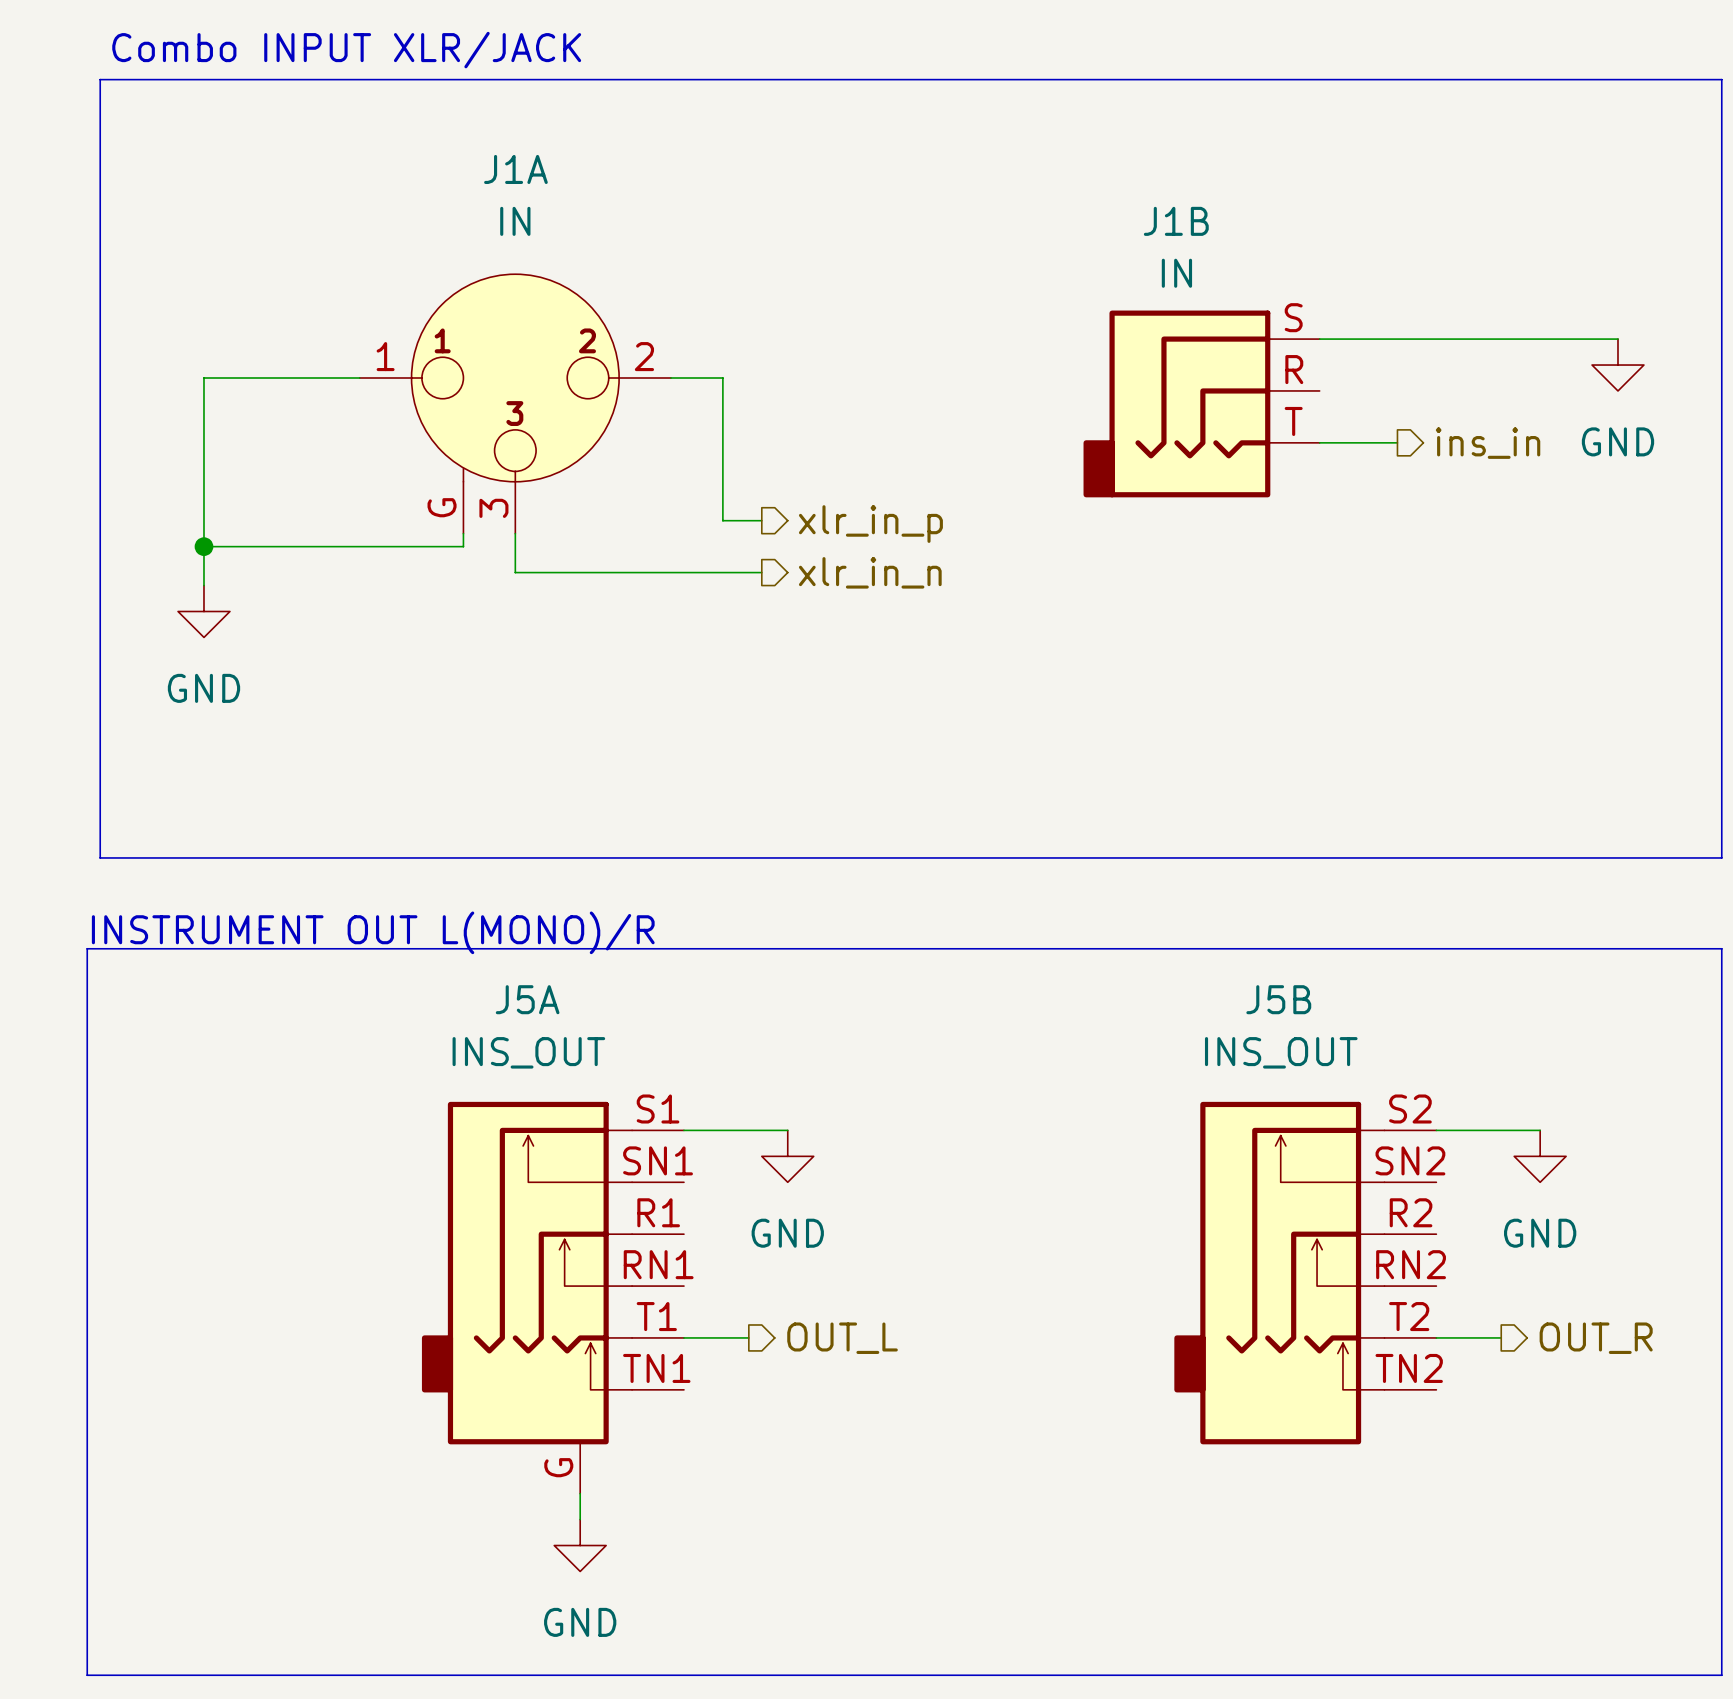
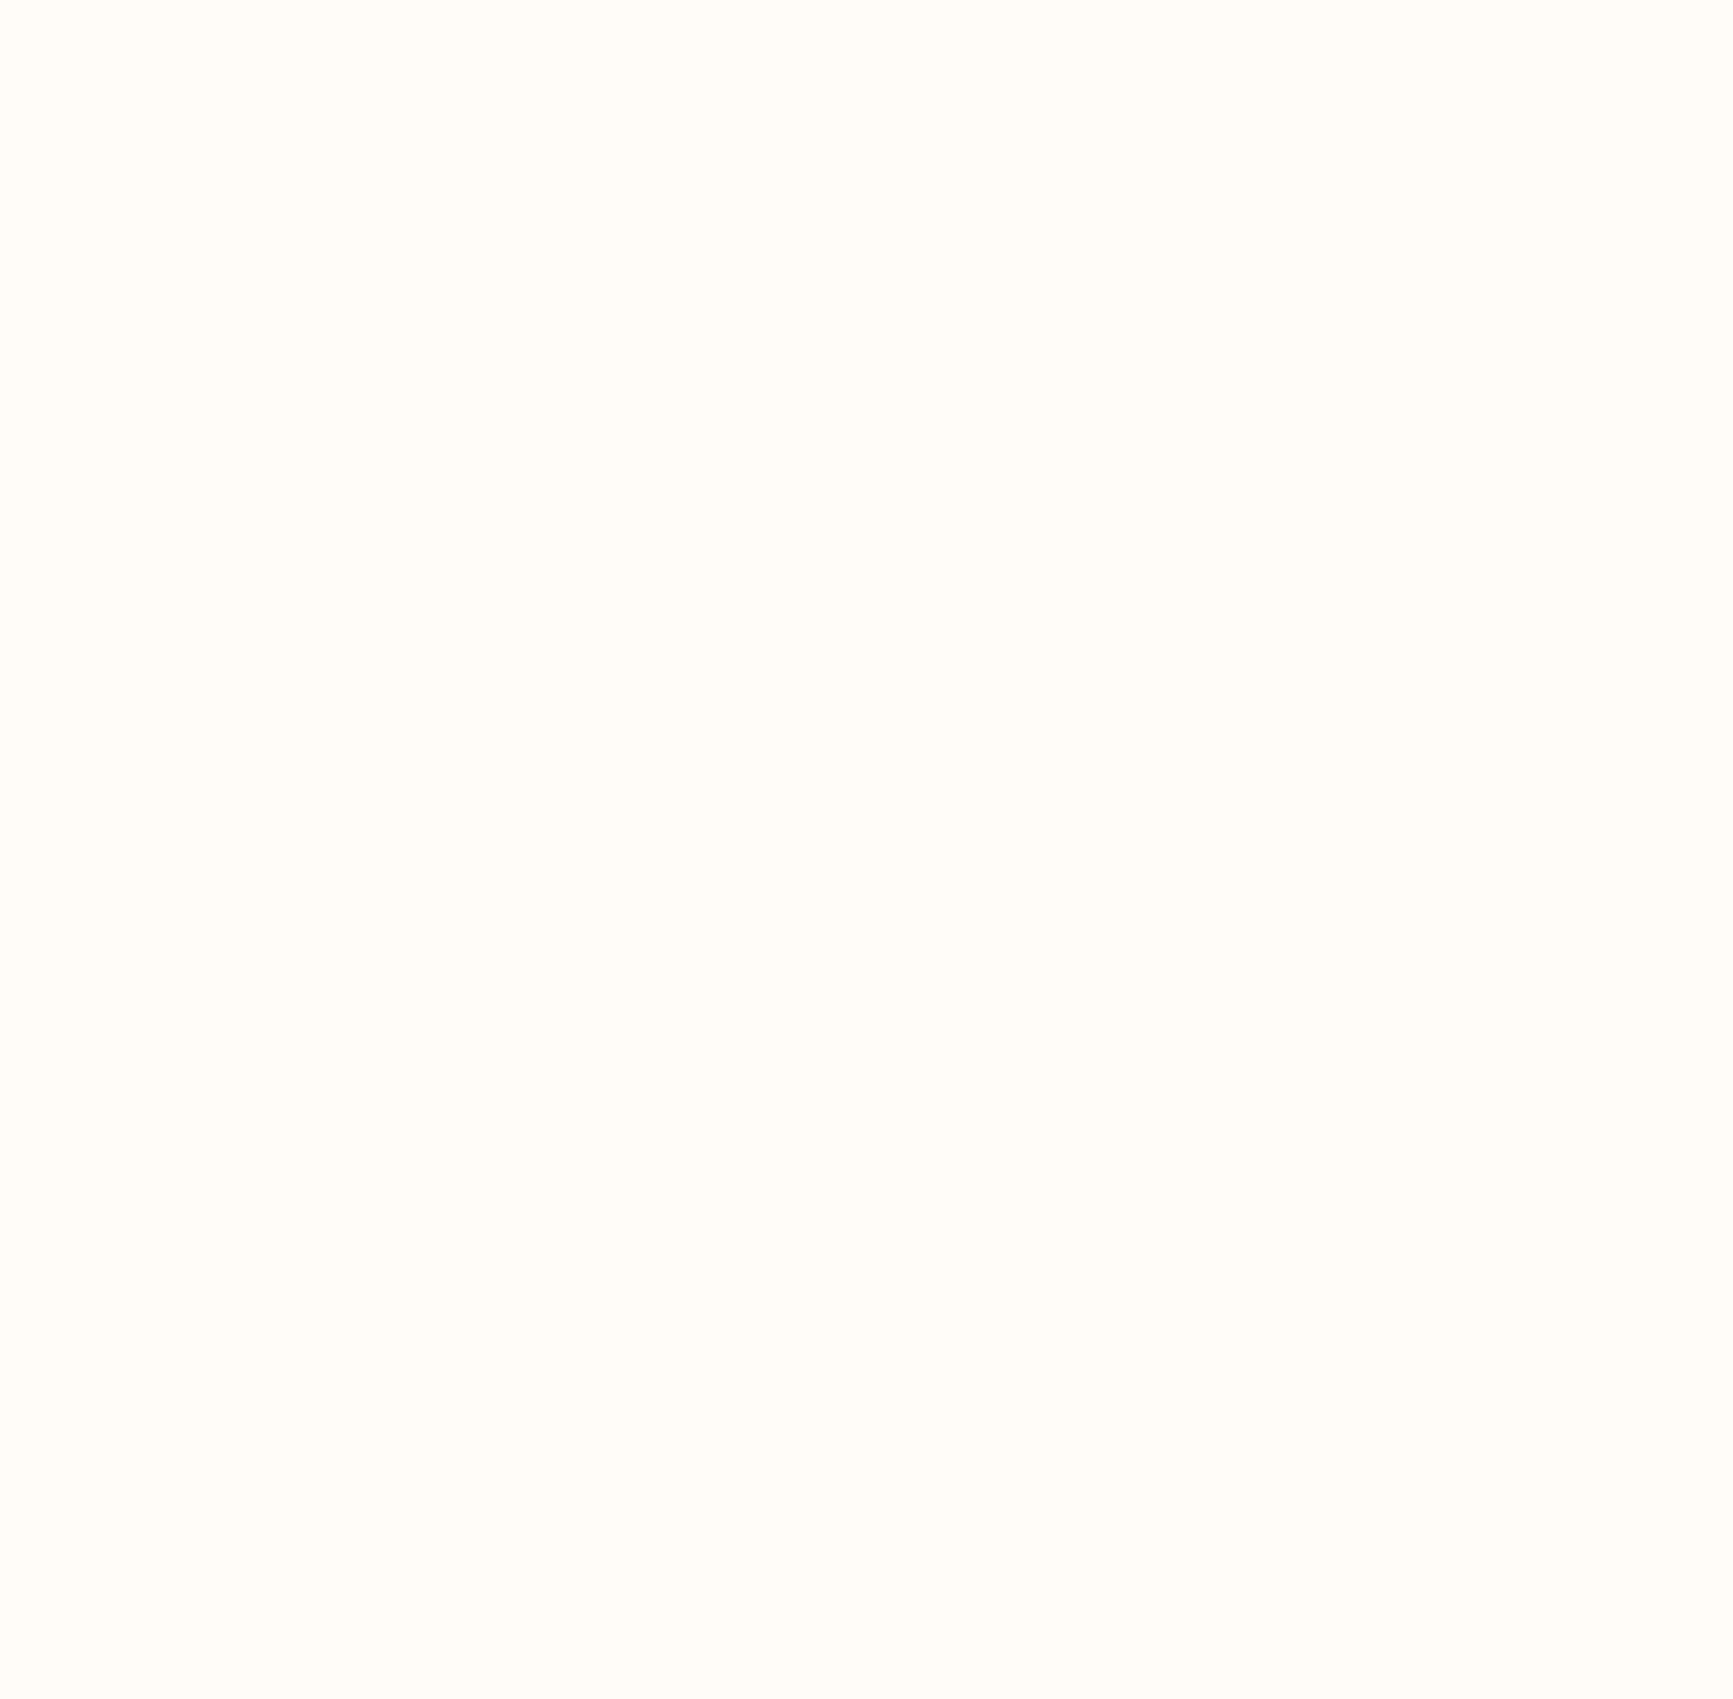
text: Combo INPUT XLR/JACK (346, 50) -> none
line: (100, 79) (1721, 79) (1721, 857) (100, 857) (100, 79) -> none
wire: (1319, 339) (1617, 339) -> none
power symbol: GND (1617, 365) -> none
wire: (359, 377) (203, 377) (203, 585) -> none
wire: (671, 377) (722, 377) (722, 520) (761, 520) -> none
J1A: IN (515, 403) -> none
J1B: IN (1201, 403) -> none
wire: (1319, 442) (1397, 442) -> none
hierarchical label: ins_in (1488, 443) -> none
hierarchical label: xlr_in_p (870, 524) -> none
wire: (463, 533) (463, 546) (203, 546) -> none
wire: (515, 533) (515, 572) (761, 572) -> none
junction: (203, 546) -> none
hierarchical label: xlr_in_n (870, 572) -> none
power symbol: GND (203, 611) -> none
text: INSTRUMENT OUT L(MONO)/R (373, 932) -> none
line: (87, 948) (1721, 948) (1721, 1675) (87, 1675) (87, 948) -> none
wire: (683, 1130) (787, 1130) -> none
wire: (1436, 1130) (1540, 1130) -> none
power symbol: GND (787, 1156) -> none
power symbol: GND (1540, 1156) -> none
J5B: INS_OUT (1305, 1273) -> none
J5A: INS_OUT (552, 1297) -> none
wire: (683, 1337) (748, 1337) -> none
wire: (1436, 1337) (1501, 1337) -> none
hierarchical label: OUT_L (842, 1338) -> none
hierarchical label: OUT_R (1596, 1338) -> none
wire: (580, 1493) (580, 1519) -> none
power symbol: GND (580, 1545) -> none

